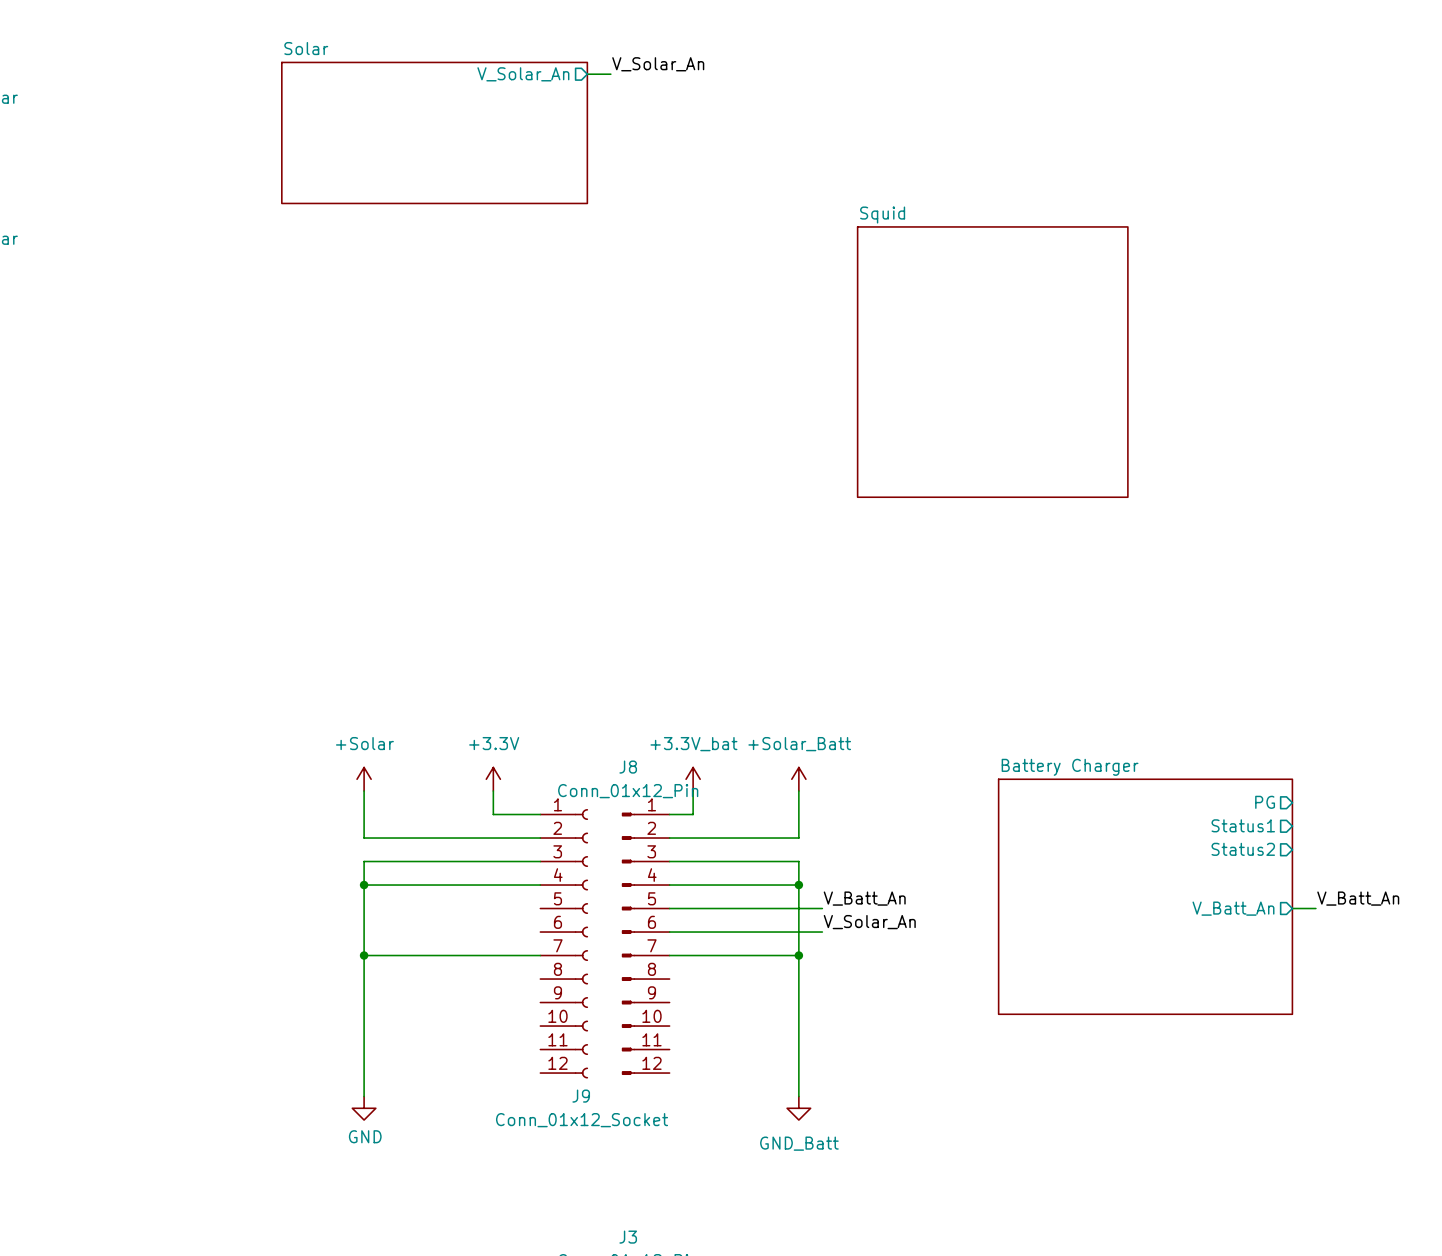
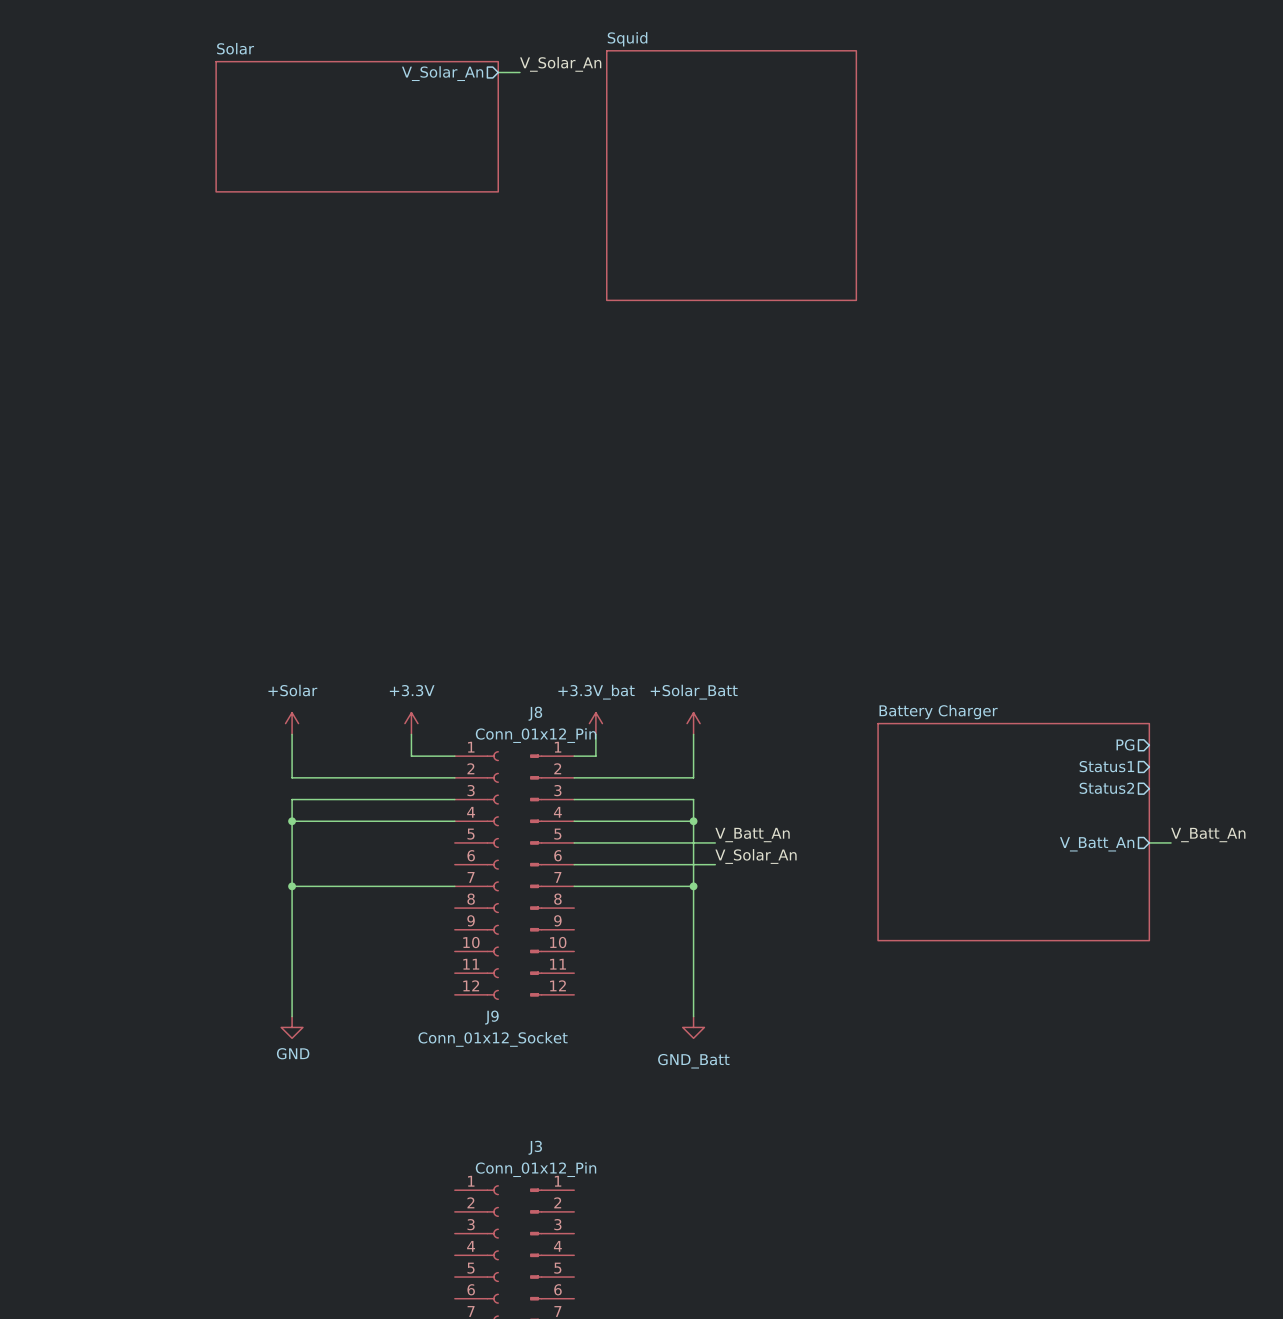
sheet Squid: none -> (731, 175)
sheet Squid: (992, 362) -> none

